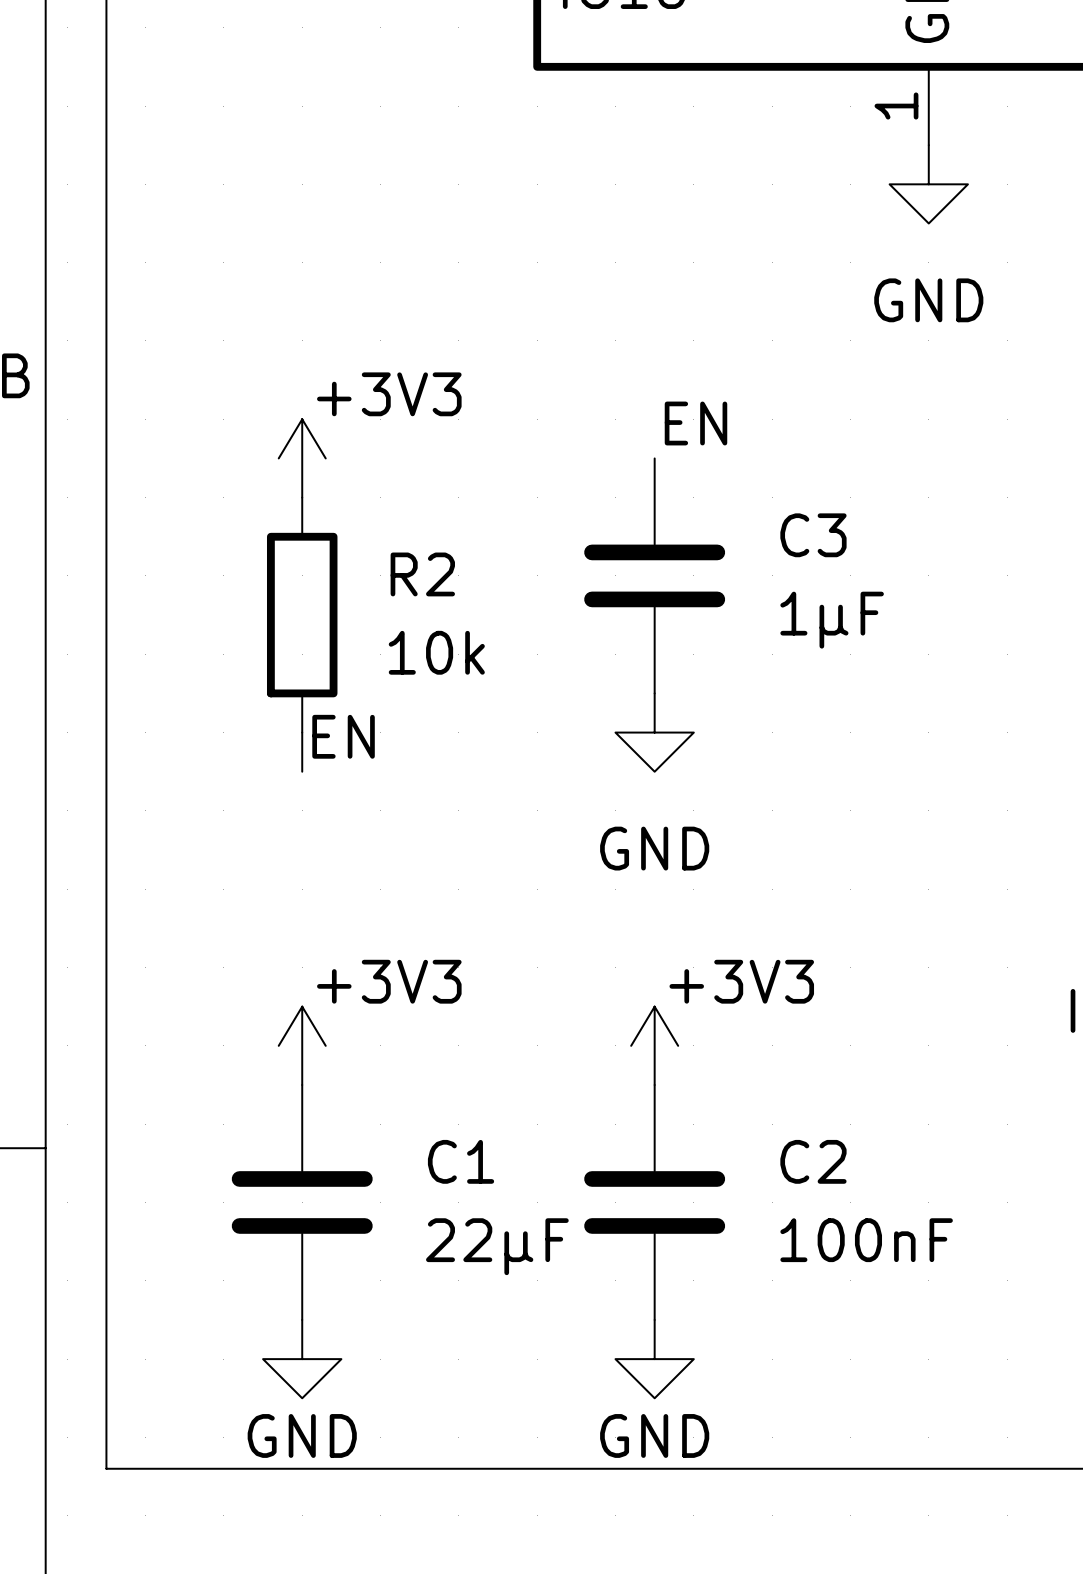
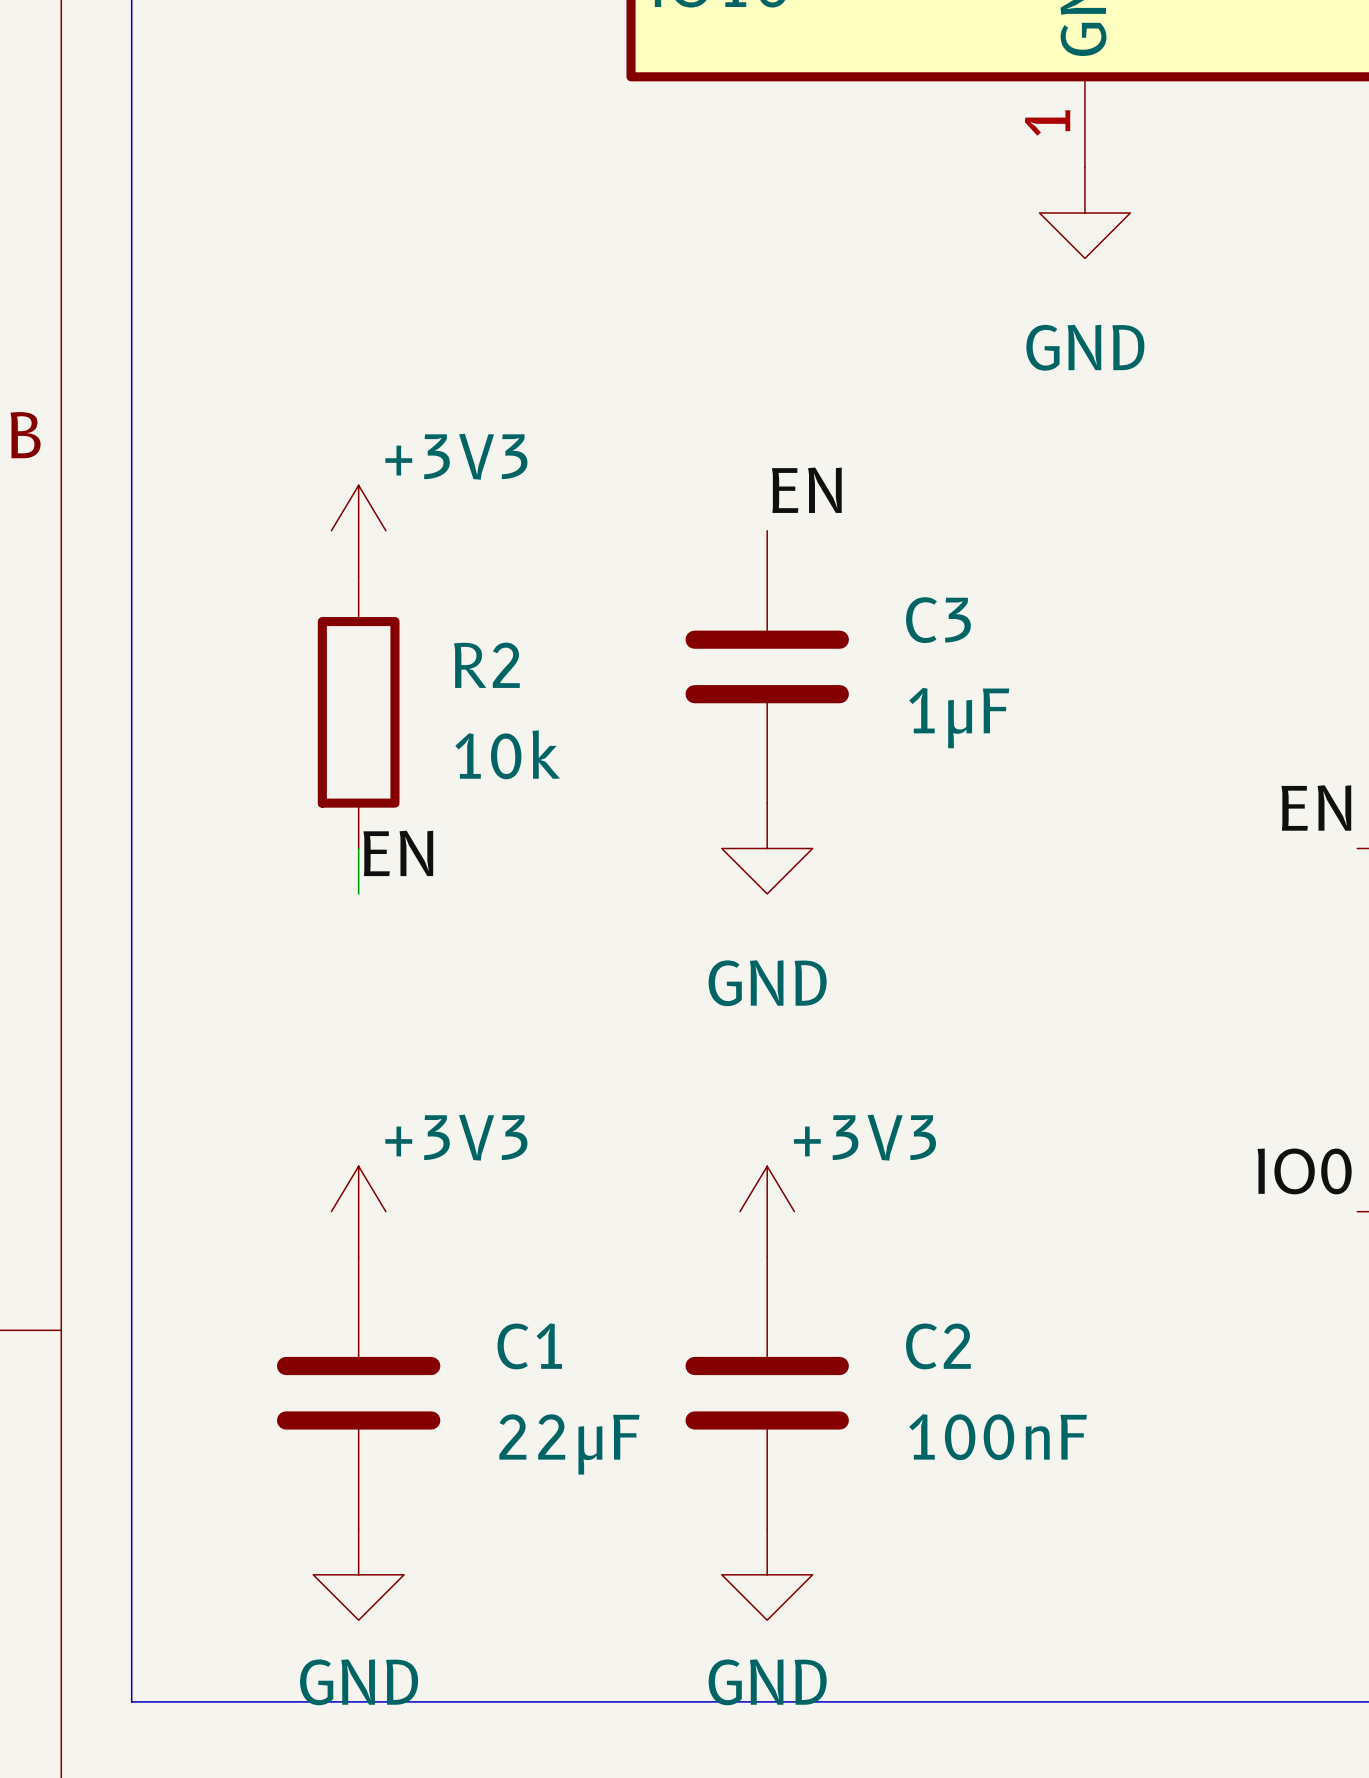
power symbol text position: GND (302, 1435) -> GND (359, 1682)
power symbol text position: GND (654, 1435) -> GND (767, 1682)

